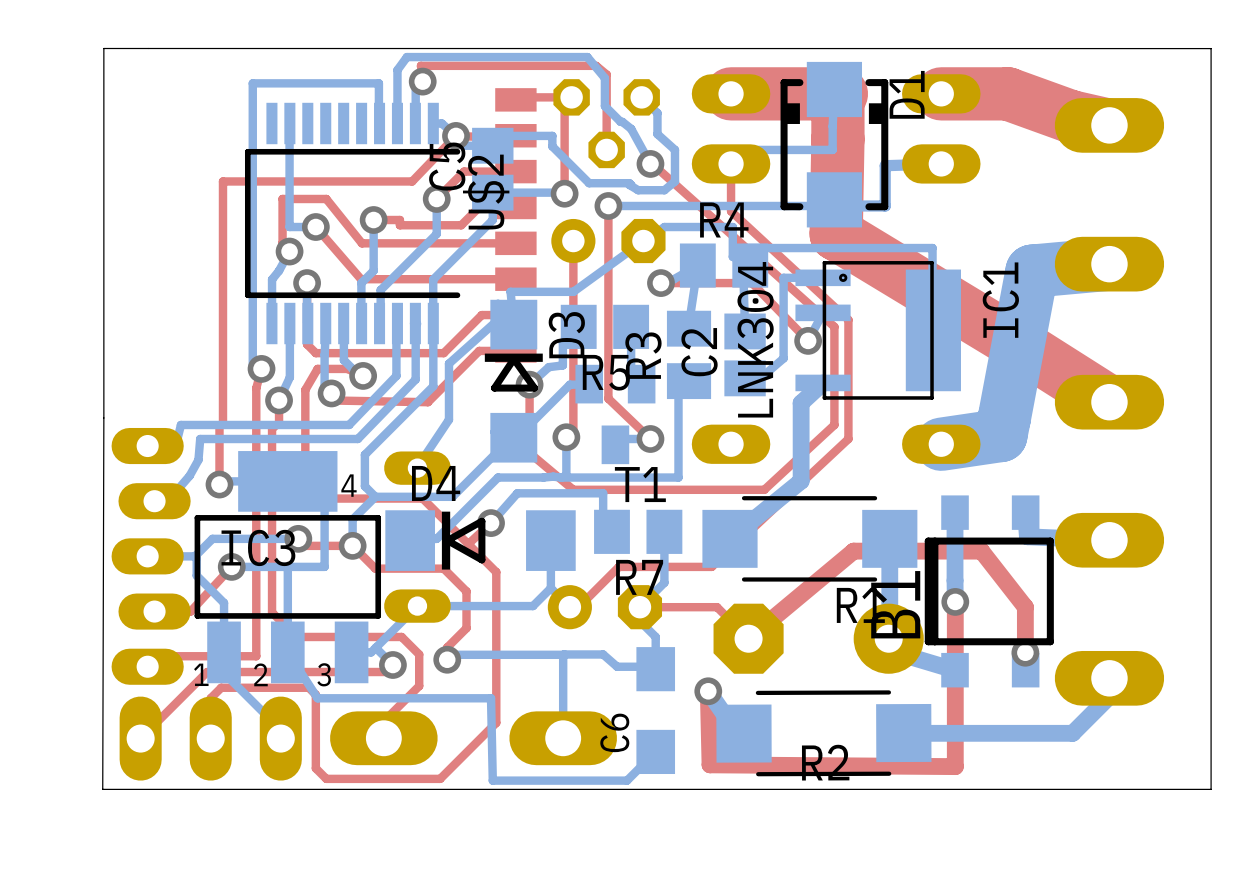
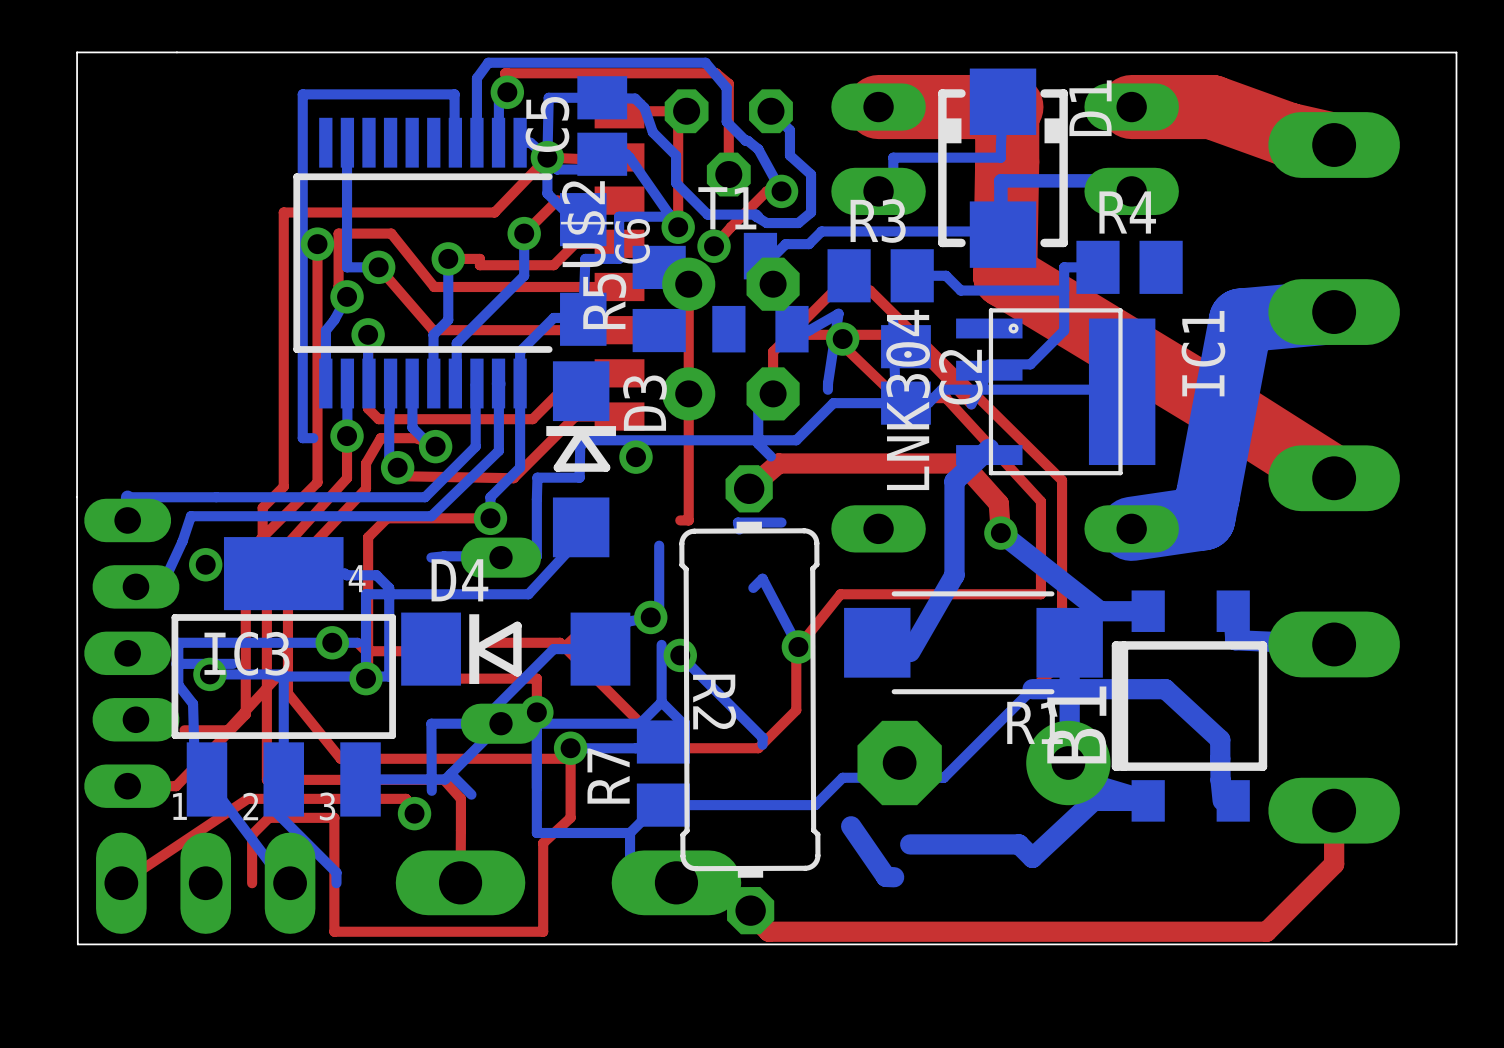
board edge: (103, 48) (102, 789) -> (123, 52) (77, 52) (77, 944) (122, 944)
bottom track: (832, 135) (832, 149) (743, 149) -> (1000, 157) (893, 157) (893, 174)
bottom track: (491, 144) (492, 145) (502, 135) (552, 135) (552, 146) (562, 156) -> (583, 219) (573, 219) (547, 193) (548, 97) (635, 98) (644, 107) (652, 132) (676, 155) (676, 182)
top track: (650, 163) (650, 162) (834, 326) (834, 424) (764, 489) (573, 489) (529, 453) (529, 384) -> (781, 191) (766, 191) (714, 246)
bottom track: (941, 163) (885, 165) (885, 205) (608, 205) -> (1131, 191) (1123, 180) (1000, 180) (1000, 242) (1000, 231) (821, 231) (808, 244) (785, 244) (770, 258) (760, 256)
C5 position: (492, 169) -> (602, 126)
top track: (731, 174) (731, 211) (848, 319) (848, 439) (711, 566) (618, 566) (578, 607) (569, 607) -> none
top track: (237, 181) (222, 181) (222, 423) -> (283, 212) (283, 486) (266, 503)
bottom track: (564, 193) (492, 192) (492, 220) (433, 279) (433, 296) -> (600, 156) (602, 154) (626, 154) (669, 216) (619, 216) (619, 258) (585, 258) (583, 319) (598, 317) (553, 317) (520, 351)
top track: (608, 205) (608, 398) (650, 439) -> none
via position: (608, 205) -> (714, 246)
top track: none -> (317, 244) (317, 482) (245, 554) (245, 714) (176, 786) (127, 786)
via: none -> (317, 244)
bottom track: none -> (1098, 267) (1064, 267) (1064, 330) (1030, 364) (989, 364)
bottom track: none -> (912, 275) (946, 275) (960, 290) (1064, 290)
R4 position: (724, 265) -> (1129, 267)
bottom track: (823, 277) (783, 277) (783, 358) (759, 379) (745, 378) -> none
via position: (660, 283) -> (842, 339)
top track: none -> (842, 339) (842, 345) (897, 398) (946, 398) (1040, 501) (1040, 594) (840, 594) (796, 649) (796, 710) (758, 748) (665, 748) (560, 642) (488, 642)
bottom track: (513, 324) (510, 291) (573, 291) (664, 227) (732, 227) (732, 256) (750, 265) (743, 272) (743, 248) (932, 248) (932, 330) -> none
bottom track: (513, 324) (498, 303) (498, 319) (448, 363) (448, 419) (417, 468) -> none
bottom track: none -> (1122, 385) (1112, 394) (1097, 389) (941, 389) (928, 403) (833, 403) (796, 440) (586, 440) (580, 446) (579, 477) (537, 477) (536, 556) (431, 557)
bottom track: (578, 326) (562, 342) (562, 365) (548, 367) (529, 384) -> none
R5 rotation: 0° (604, 326) -> 90° clockwise (659, 298)
R5 position: (604, 326) -> (659, 298)
top track: none -> (773, 393) (773, 351) (834, 290) (870, 290) (1062, 480) (1062, 661) (1026, 695)
via: (808, 340) -> none
C2 name position: C2 (699, 352) -> C2 (960, 377)
R3 rotation: 0° (689, 354) -> 90° clockwise (880, 275)
R3 position: (689, 354) -> (880, 275)
C2 position: (745, 354) -> (905, 374)
bottom track: (289, 366) (289, 377) (279, 400) -> none
top track: none -> (347, 436) (347, 478) (266, 566) (266, 779) (444, 779) (460, 798) (460, 881) (414, 882)
via: none -> (347, 436)
top track: (261, 368) (256, 388) (256, 656) (147, 656) (147, 666) -> none
via: (261, 368) -> none
bottom track: (396, 375) (349, 424) (180, 424) (175, 446) (147, 446) -> (475, 446) (425, 497) (127, 497) (127, 520)
bottom track: none -> (989, 448) (954, 481) (954, 575) (910, 652)
bottom track: (415, 379) (357, 439) (200, 439) (198, 460) (189, 475) (167, 501) (154, 501) -> (498, 450) (431, 516) (190, 516) (182, 541) (162, 584) (135, 586)
D3 position: (513, 381) -> (581, 459)
bottom track: (689, 381) (678, 381) (678, 477) (561, 477) -> none
bottom track: (823, 382) (801, 403) (801, 481) (729, 538) -> none
bottom track: (589, 384) (569, 384) (522, 432) (513, 437) (510, 431) (494, 431) -> none
bottom track: (433, 386) (364, 454) (364, 486) (375, 496) -> (520, 459) (520, 467) (490, 497) (490, 518)
top track: (279, 400) (279, 423) (272, 428) (272, 612) (296, 636) (401, 636) (419, 654) (419, 686) (383, 721) (383, 738) -> none
via: (279, 400) -> none
top track: (305, 410) (305, 498) (422, 498) (496, 572) (496, 722) (440, 778) -> (366, 488) (287, 571) (287, 693) (340, 758) (570, 758)
top track: none -> (749, 488) (778, 463) (962, 463) (998, 503) (1000, 533)
T1 rotation: 0° (615, 414) -> 180° (760, 292)
T1 position: (615, 414) -> (760, 292)
bottom track: (494, 431) (496, 433) (496, 453) (452, 496) (375, 496) -> none
top track: none -> (490, 518) (387, 518) (368, 537) (368, 676) (366, 678)
via: none -> (490, 518)
bottom track: (566, 437) (566, 475) (561, 477) -> none
via: (566, 437) -> none
via: (650, 439) -> none
bottom track: none -> (600, 528) (577, 531) (579, 539) (528, 594) (366, 594) (366, 678)
bottom track: none -> (1000, 533) (1100, 611) (1137, 611)
via: none -> (1000, 533)
bottom track: none -> (659, 545) (659, 609) (650, 617) (627, 621) (600, 649) (553, 649) (479, 723) (431, 723) (431, 790)
via: none -> (205, 564)
bottom track: (561, 477) (498, 477) (436, 538) (410, 540) -> none
via: (219, 484) -> none
bottom track: none -> (753, 587) (762, 578) (798, 647)
bottom track: (375, 496) (352, 519) (352, 545) -> none
bottom track: (955, 512) (955, 601) -> none
via: none -> (650, 617)
bottom track: (491, 523) (517, 493) (603, 493) (603, 531) (611, 531) -> none
via: (491, 523) -> none
R7 rotation: 0° (638, 531) -> 90° clockwise (663, 773)
R7 position: (638, 531) -> (663, 773)
bottom track: (664, 531) (664, 582) (639, 607) (639, 621) (655, 636) (655, 669) (653, 666) (617, 666) (603, 654) (563, 654) -> none
bottom track: (212, 538) (194, 556) (196, 558) (196, 575) (224, 602) (224, 652) (217, 659) -> (254, 642) (178, 642) (178, 684) (193, 703) (194, 749) (206, 779) (271, 864) (271, 883) (290, 883)
via position: (298, 538) -> (332, 642)
D4 position: (480, 540) -> (515, 649)
via: none -> (798, 647)
via: (352, 545) -> none
bottom track: none -> (680, 655) (762, 737) (762, 744)
via: none -> (680, 655)
part position: (151, 556) -> (131, 653)
bottom track: none -> (209, 674) (283, 674) (283, 779)
via: none -> (209, 674)
via: (231, 566) -> none
bottom track: (287, 566) (287, 652) (317, 698) (491, 698) (492, 780) (627, 780) (655, 751) -> none
IC3 position: (287, 567) -> (283, 676)
via: none -> (366, 678)
top track: (443, 568) (466, 591) (466, 628) (447, 647) (447, 659) -> (532, 678) (536, 678) (536, 712)
via: none -> (536, 712)
top track: (955, 601) (955, 766) (710, 764) (708, 691) -> none
via: (955, 601) -> none
part position: (604, 607) -> (730, 393)
top track: (639, 607) (717, 607) (748, 638) (853, 551) (981, 551) (1025, 607) (1025, 652) -> none
bottom track: none -> (663, 741) (635, 748) (570, 748)
top track: none -> (570, 748) (570, 817) (543, 843) (543, 931) (528, 931)
via: none -> (570, 748)
bottom track: none -> (421, 779) (360, 779)
via: (1025, 652) -> none
bottom track: (563, 654) (452, 654) (447, 659) -> (630, 832) (536, 832) (536, 712) (536, 788)
bottom track: (563, 654) (563, 738) -> none
via: (447, 659) -> none
top track: (392, 665) (385, 672) (207, 672) (140, 738) -> none
via: (392, 665) -> none
bottom track: none -> (1137, 800) (1094, 799) (1032, 857) (1019, 844) (910, 844)
bottom track: none -> (1222, 800) (1220, 739) (1165, 689) (1032, 689) (943, 777) (842, 777) (815, 805) (657, 805) (630, 832)
bottom track: (1109, 678) (1109, 696) (1072, 733) (897, 733) (903, 733) -> none
top track: none -> (1334, 810) (1334, 864) (1266, 931) (768, 931) (750, 913) (750, 910)
top track: none -> (414, 813) (406, 798) (247, 798) (121, 883)
via: none -> (414, 813)
top track: (221, 687) (308, 687) (315, 694) (315, 768) (326, 778) -> (264, 822) (268, 817) (334, 817) (334, 931) (391, 931)
R2 footprint: [716, 690, 932, 777] -> [679, 465, 821, 935]
via: (708, 691) -> none
bottom track: none -> (630, 832) (630, 882)
C6 position: (655, 710) -> (583, 269)
C6 name position: C6 (614, 732) -> C6 (632, 241)
part position: (210, 738) -> (205, 883)

